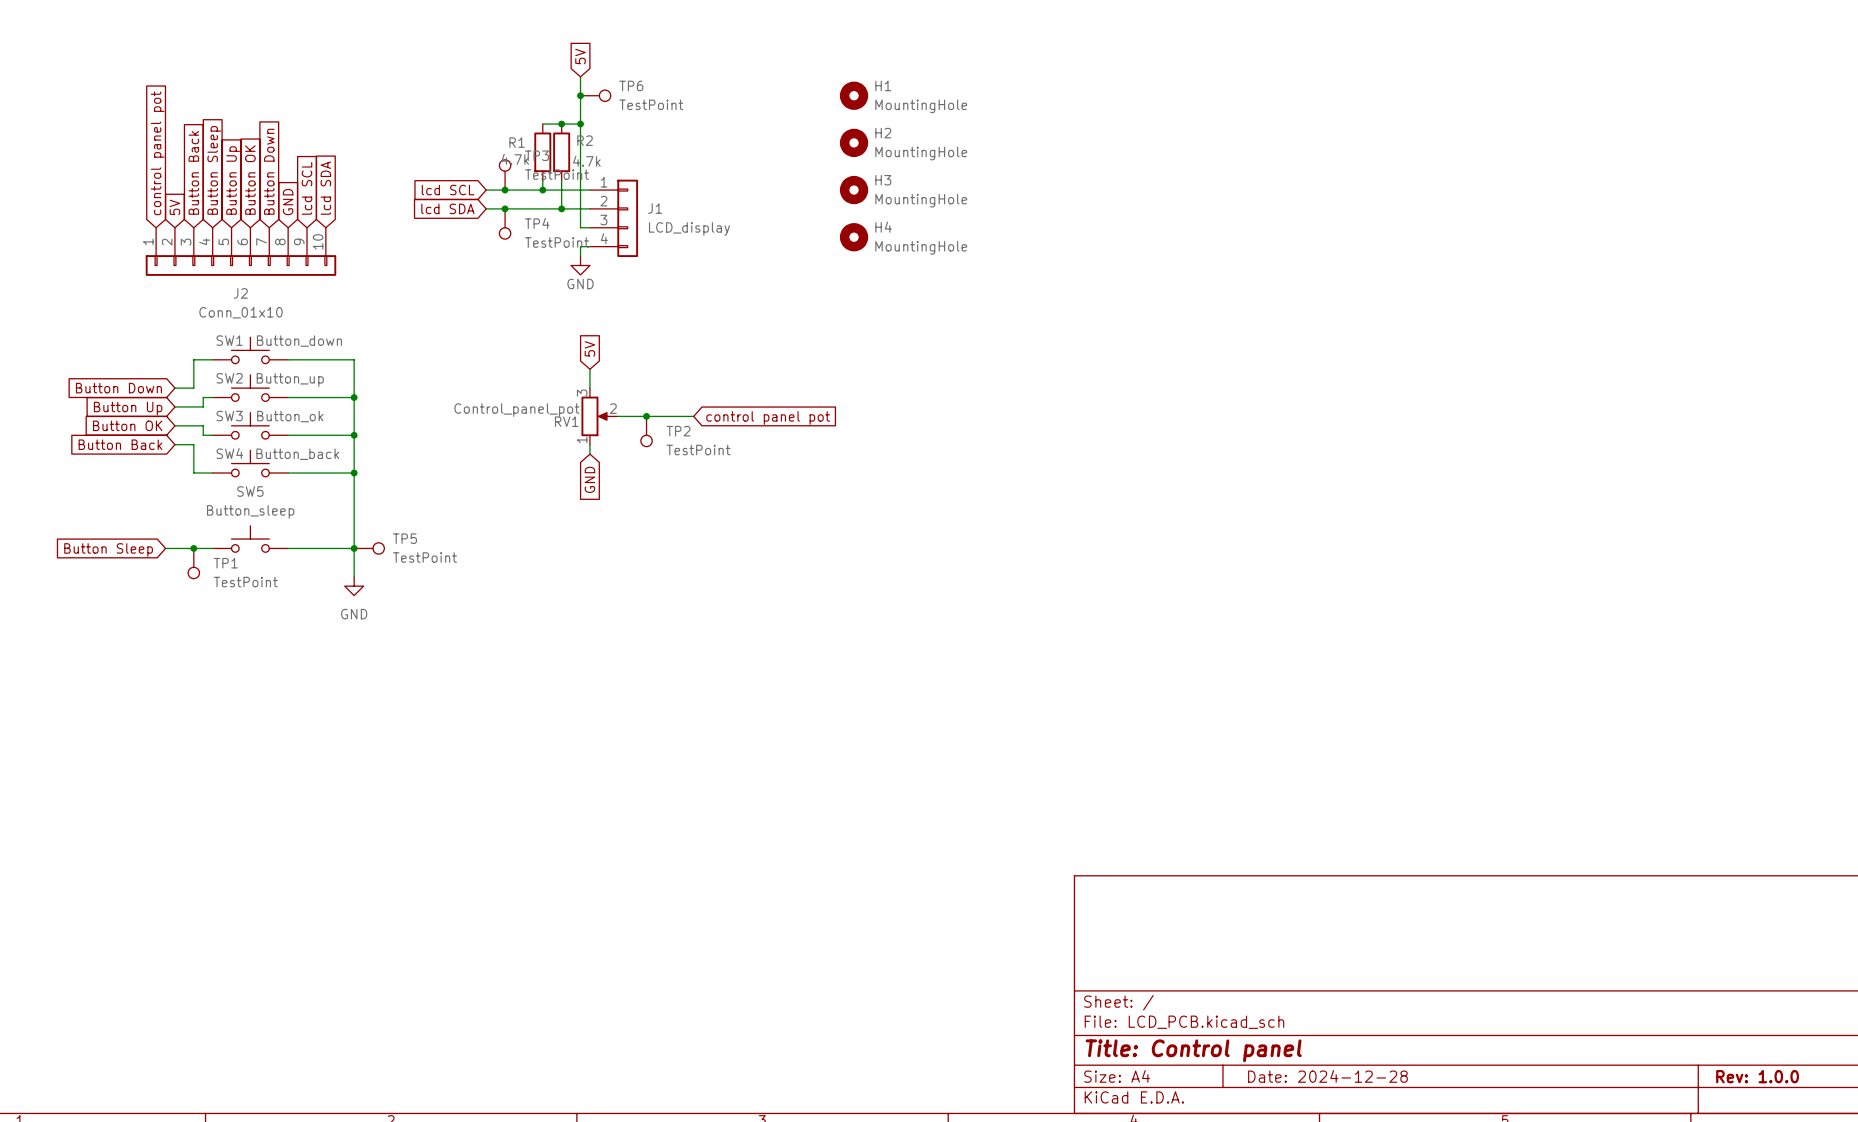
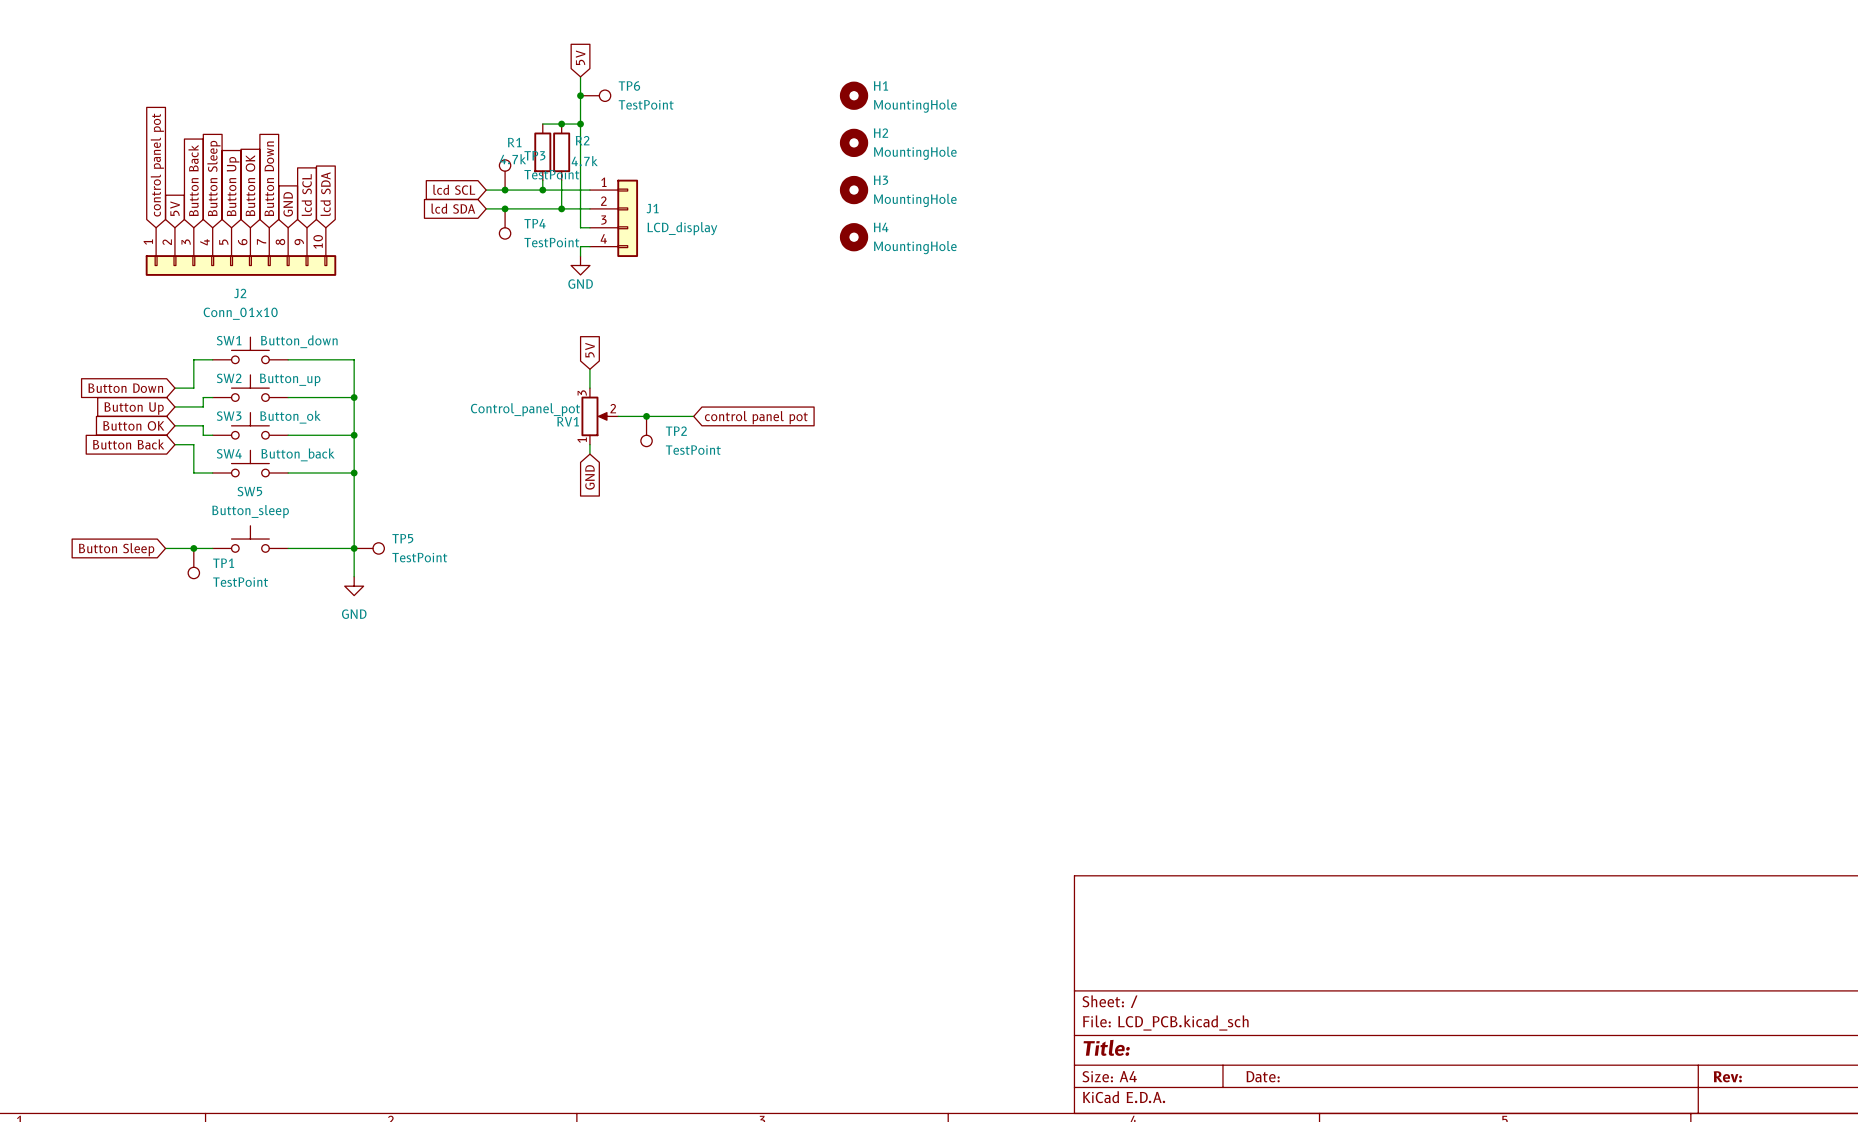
title block: Title: Control panel (1193, 1050) -> Title: (1106, 1047)
title block: Date: 2024-12-28 (1327, 1076) -> Date: (1263, 1076)
title block: Rev: 1.0.0 (1757, 1076) -> Rev: (1727, 1076)

